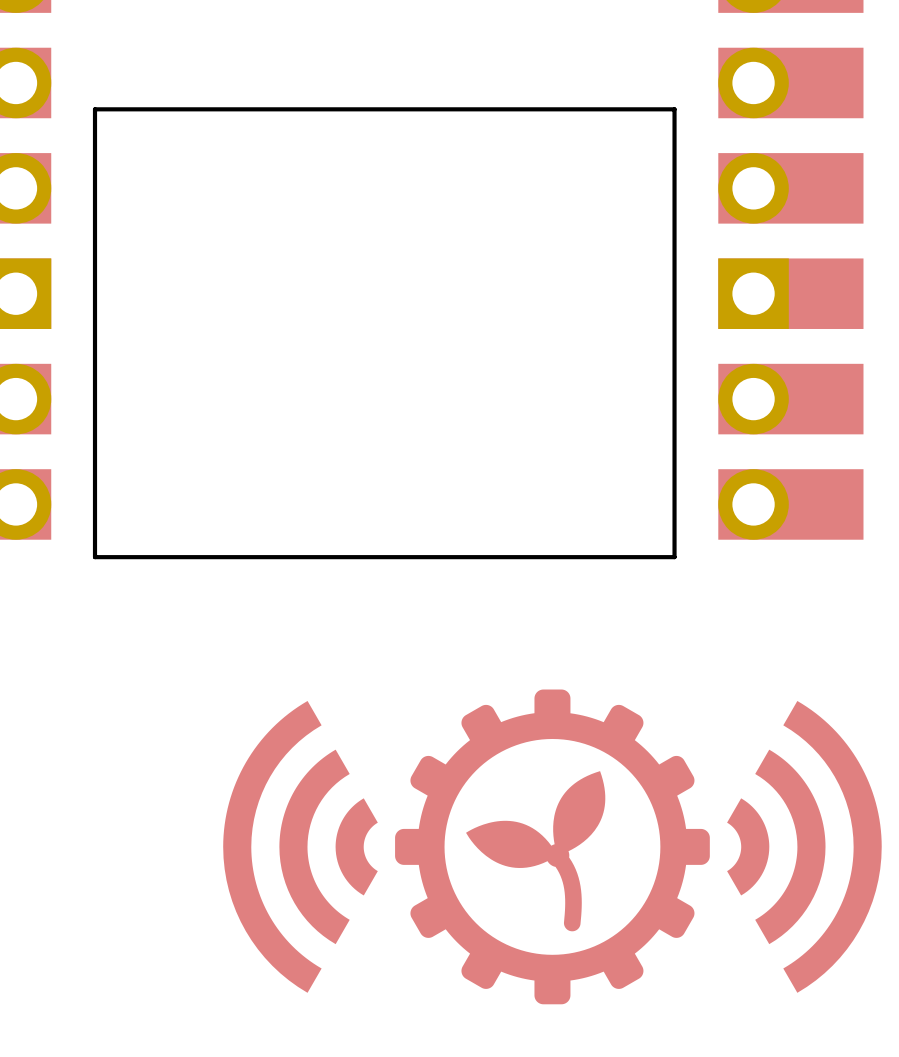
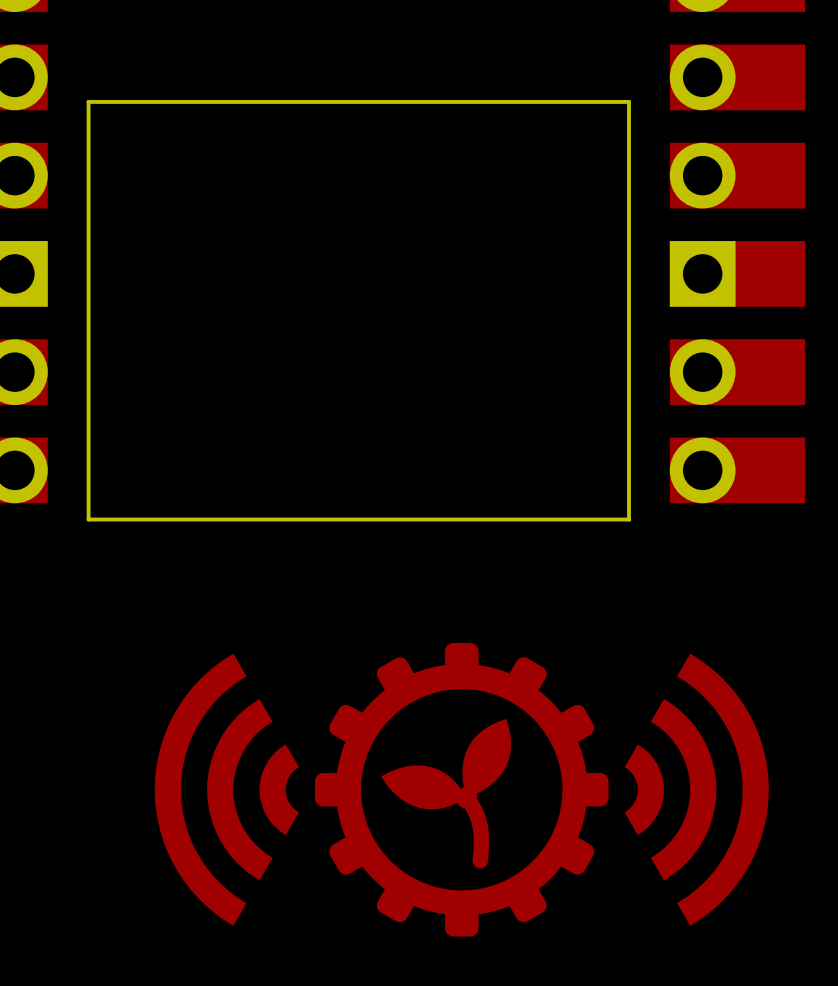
drawing position: (272, 846) -> (200, 789)
drawing position: (314, 846) -> (239, 789)
drawing position: (356, 846) -> (279, 789)
drawing position: (552, 846) -> (461, 789)
drawing position: (748, 846) -> (644, 789)
drawing position: (790, 846) -> (683, 789)
drawing position: (832, 846) -> (722, 789)
drawing position: (535, 851) -> (446, 793)

